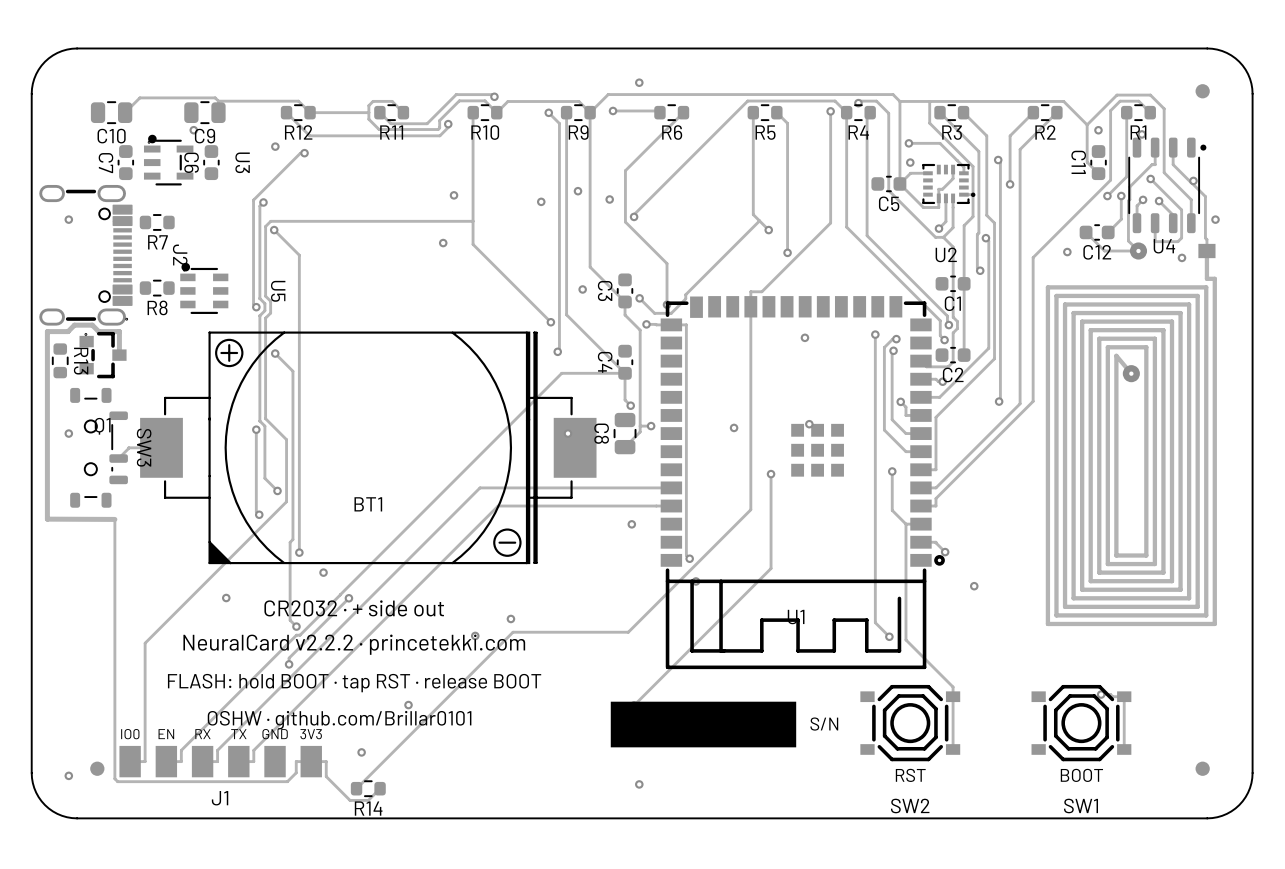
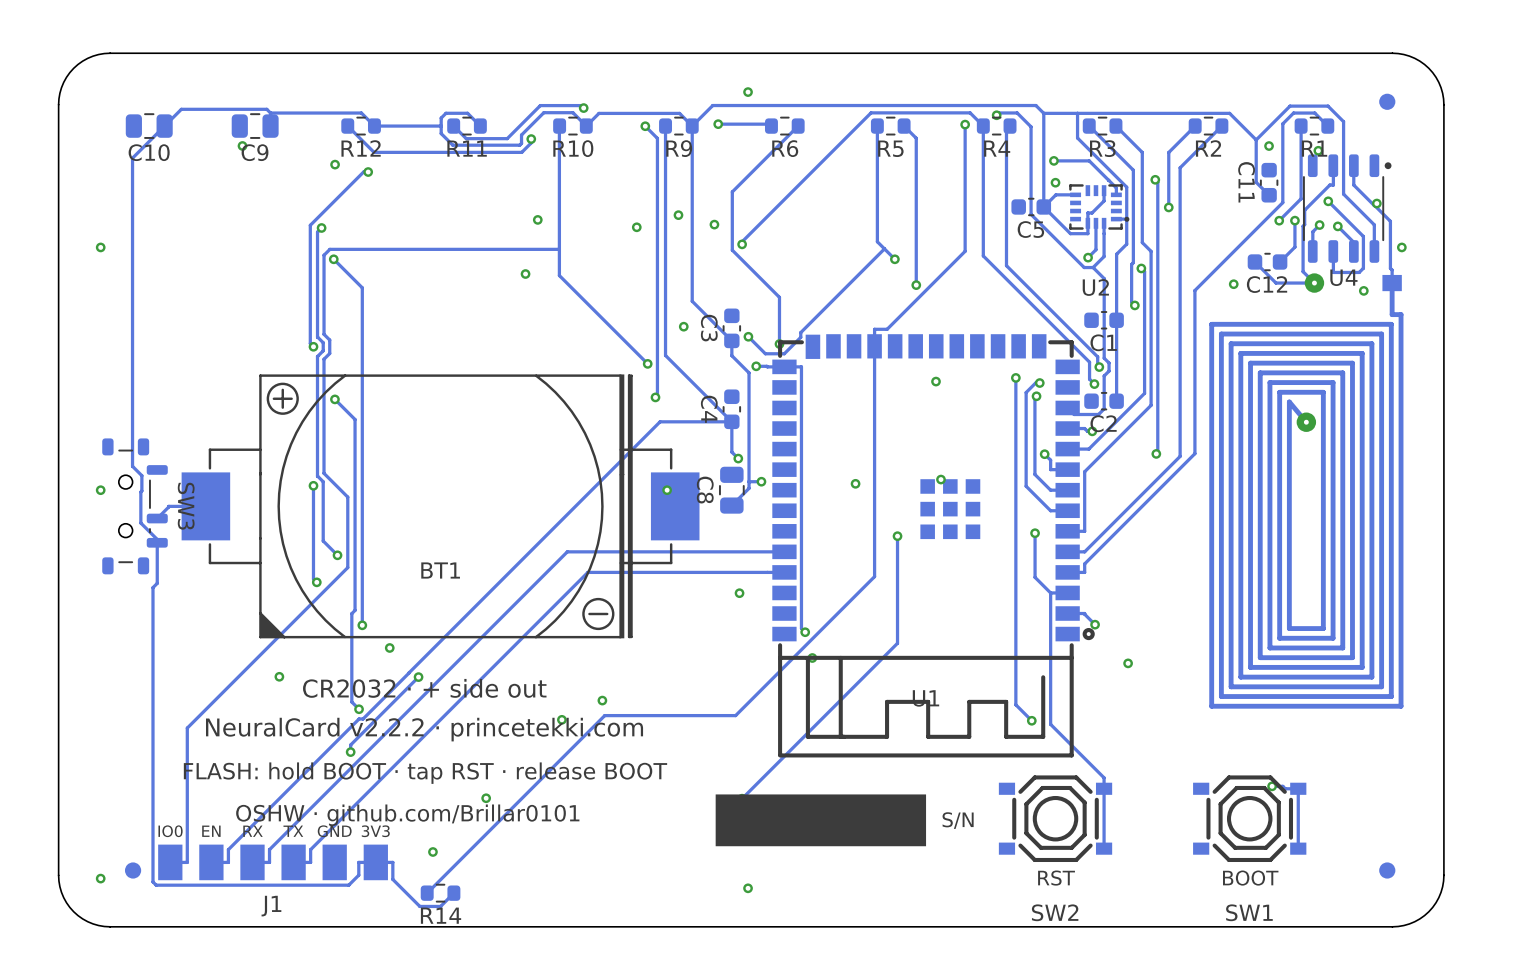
U3: (168, 160) -> none
C7: (125, 162) -> none
C6: (211, 162) -> none
R7: (157, 222) -> none
J2: (85, 255) -> none
R8: (157, 288) -> none
U5: (204, 288) -> none
Q1: (103, 355) -> none
track: (119, 355) (119, 331) (98, 331) (92, 325) (74, 325) (68, 331) (47, 331) (47, 519) (114, 519) -> (164, 126) (132, 158) (132, 466) (141, 475) (140, 523) (157, 539) (157, 583) (152, 587)
R13: (60, 360) -> none

